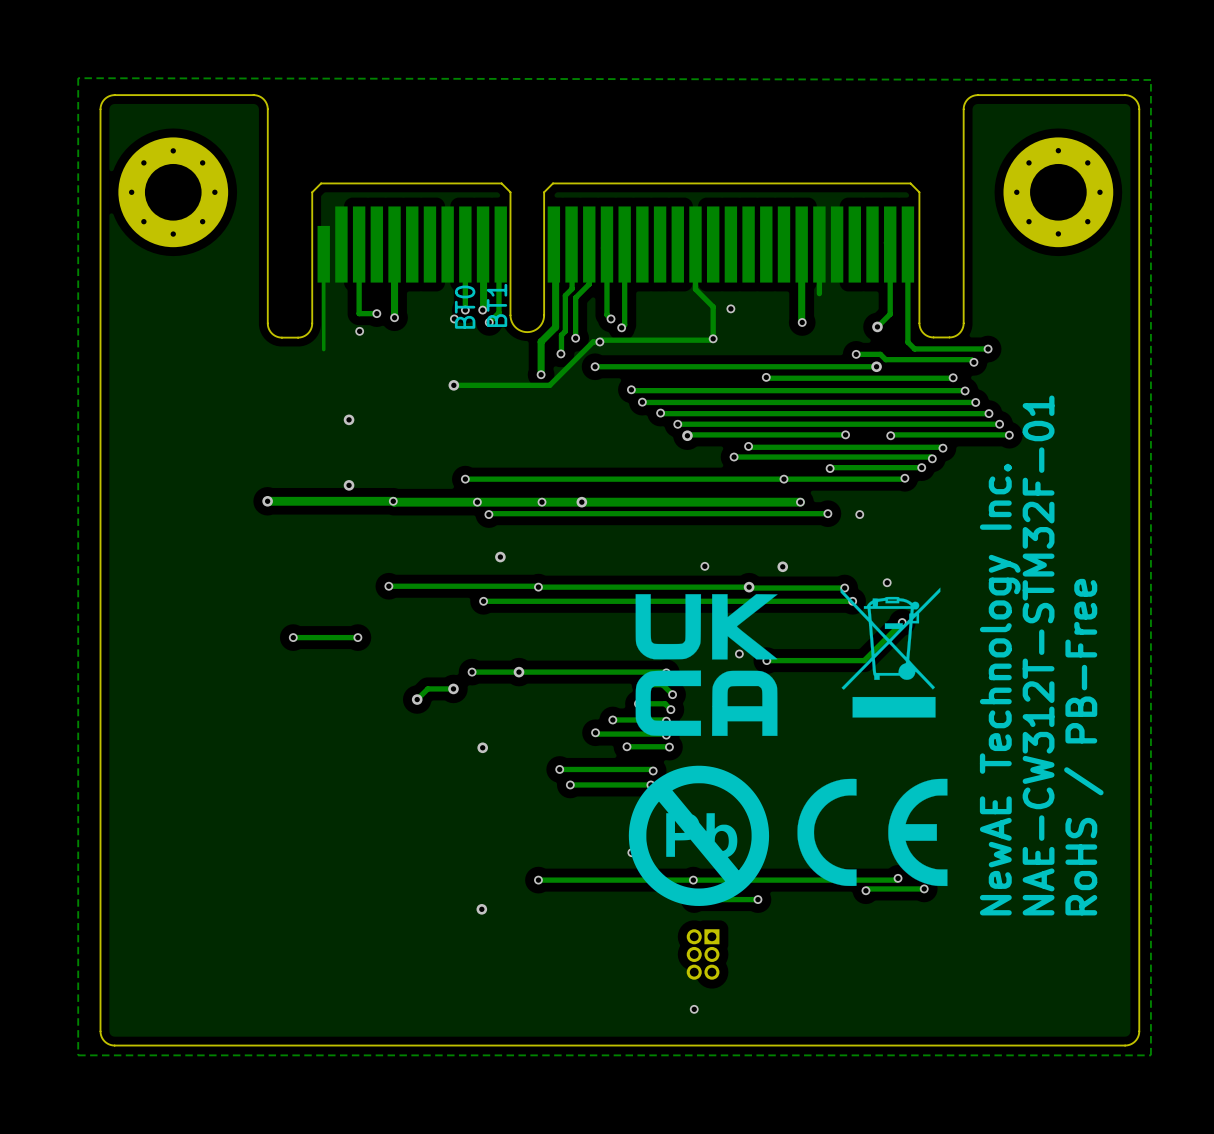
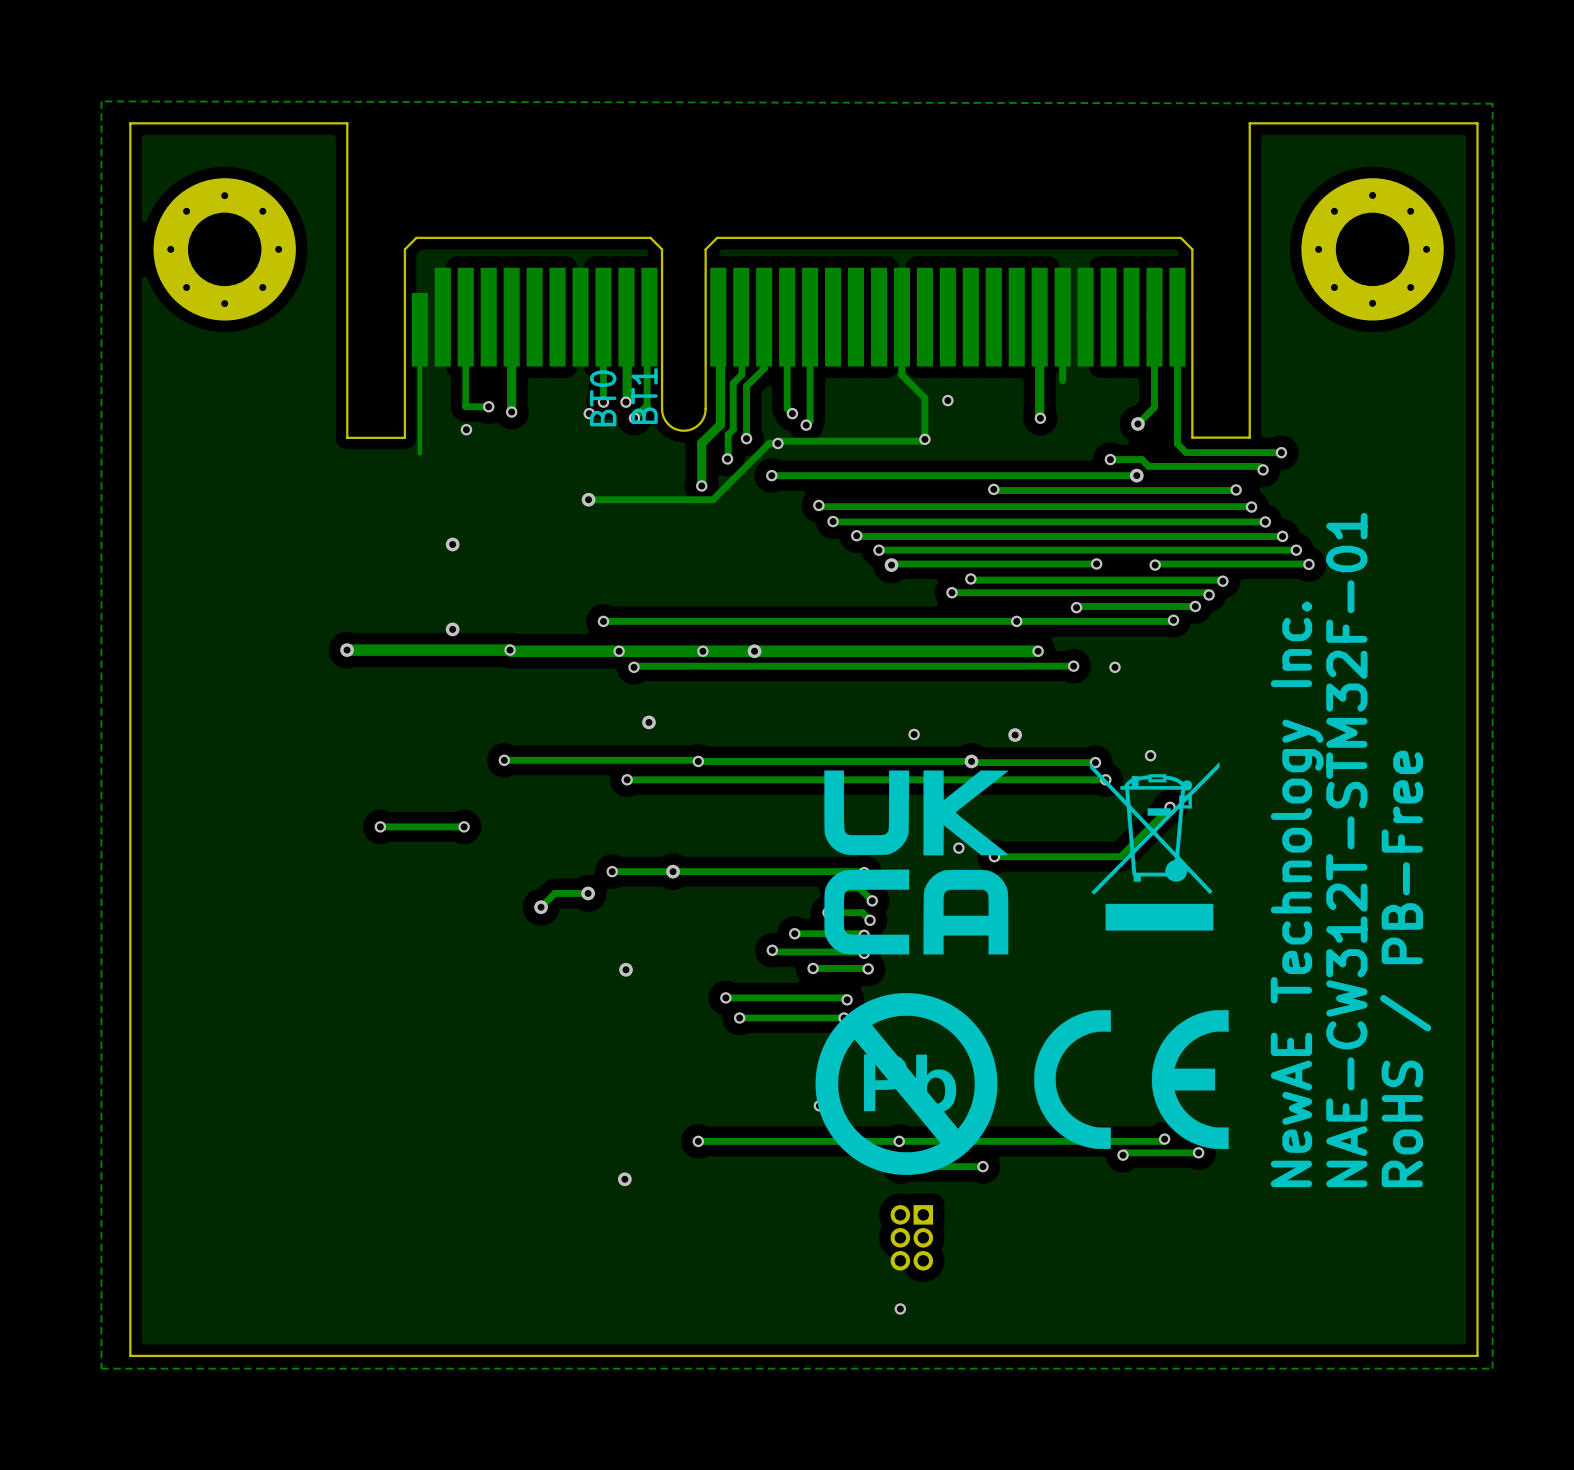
part footprint: [99, 94, 1141, 1047] -> [129, 122, 1479, 1358]

